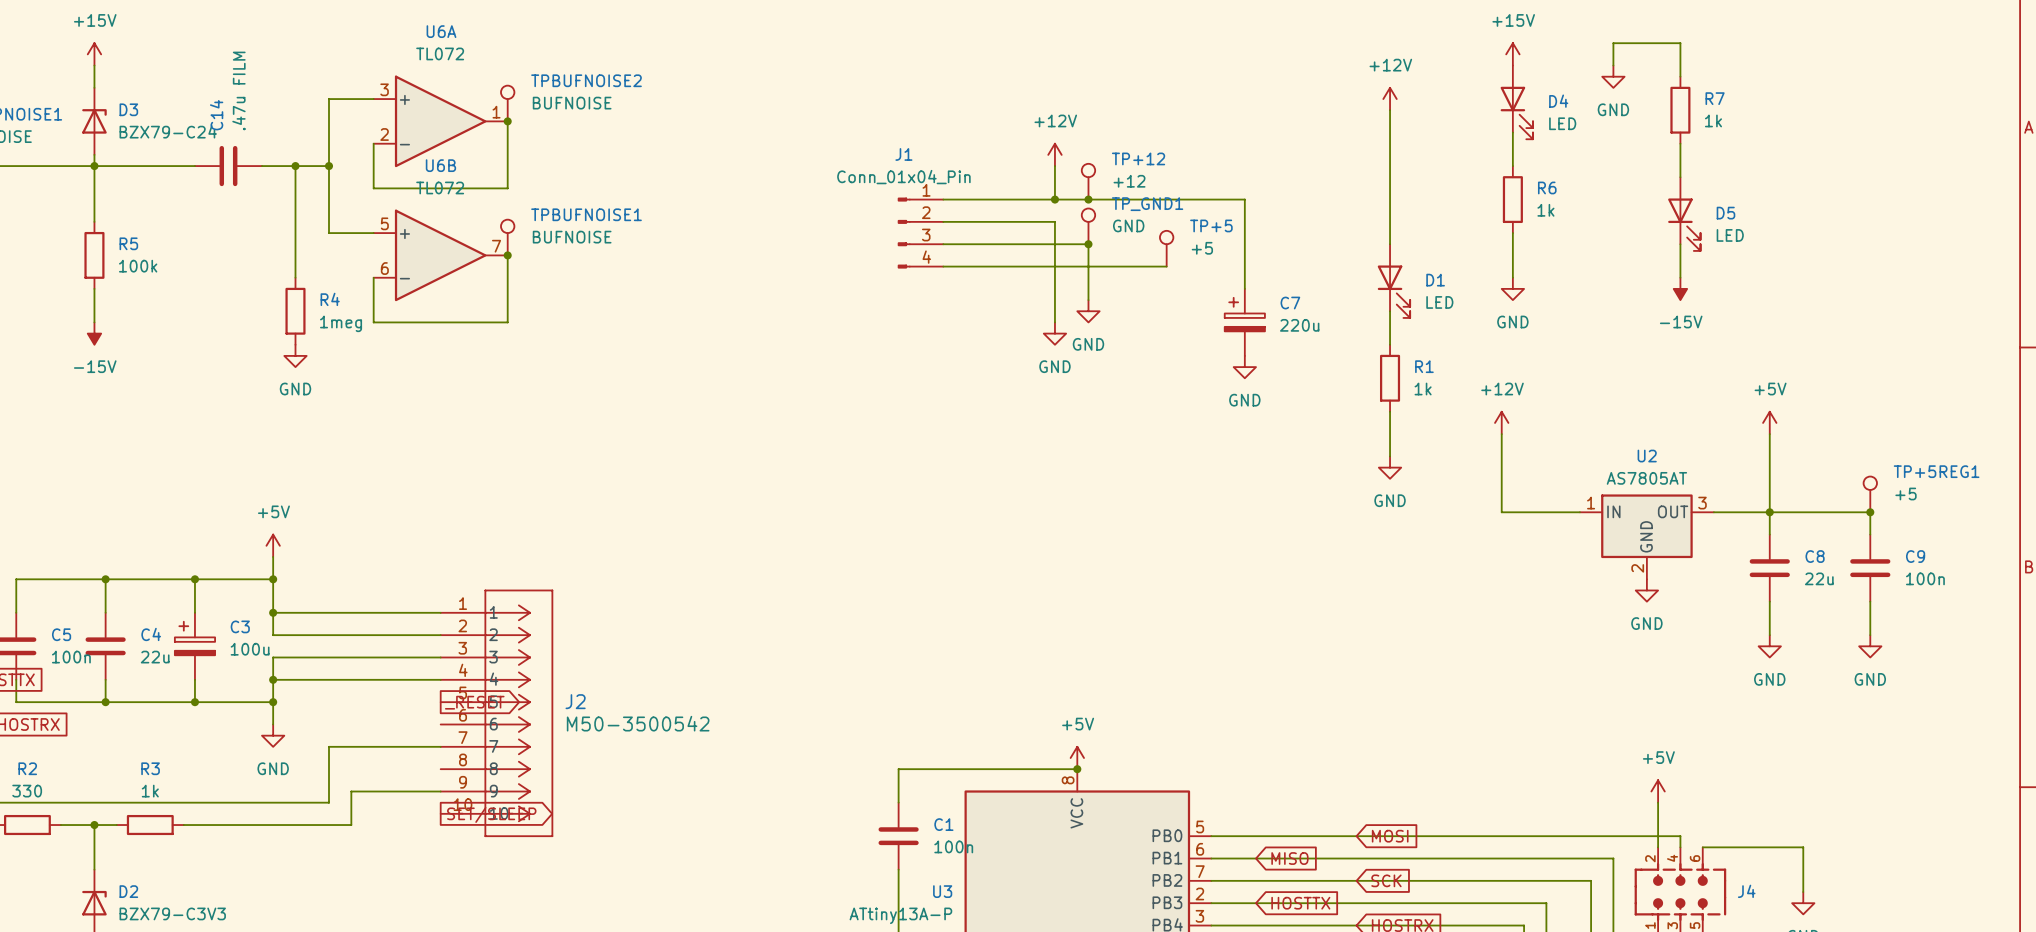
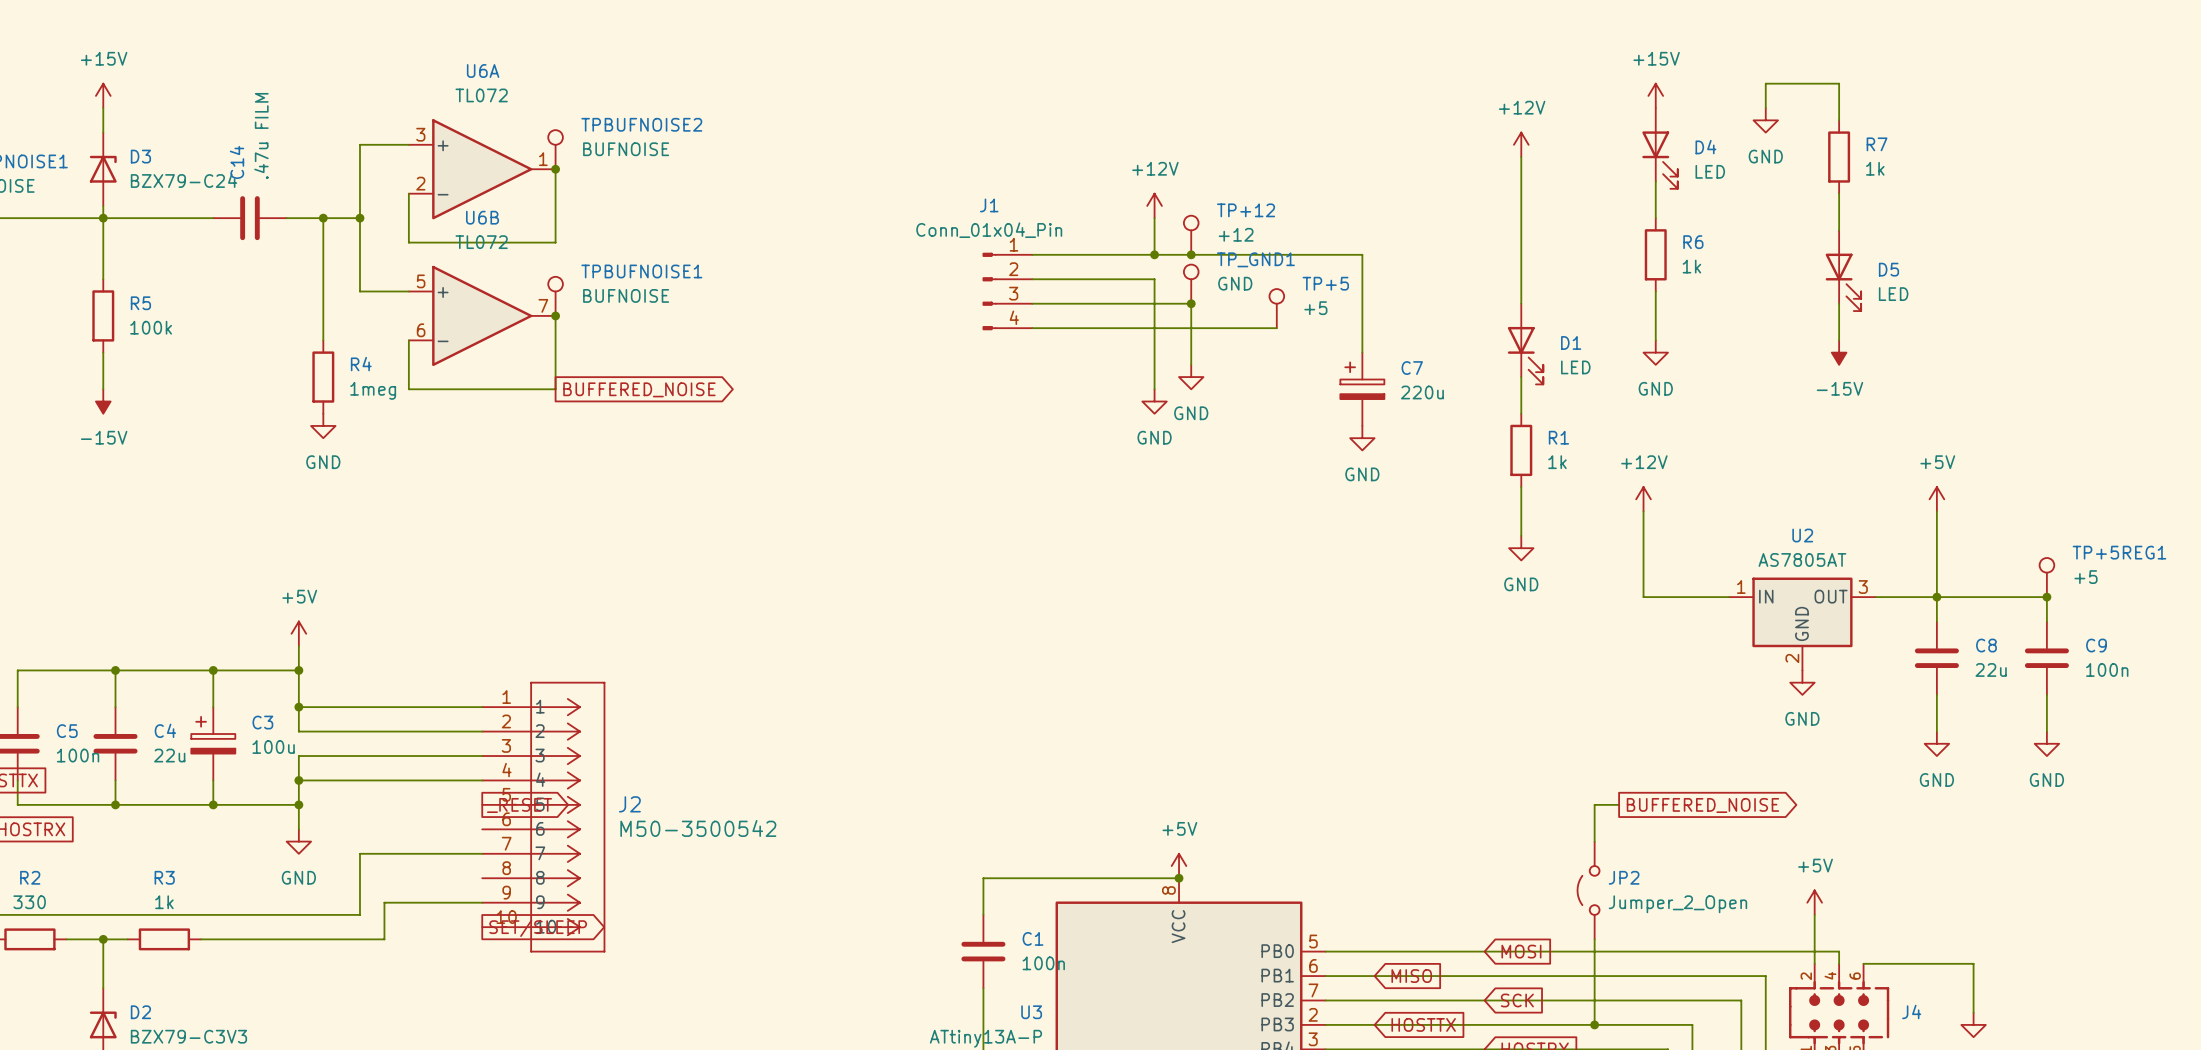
global label: none -> BUFFERED_NOISE (639, 389)
wire: none -> (1619, 804) (1594, 804) (1594, 841)
global label: none -> BUFFERED_NOISE (1702, 805)
JP2: none -> Jumper_2_Open (1588, 890)
wire: none -> (1594, 939) (1594, 1024)
junction: none -> (1594, 1024)

